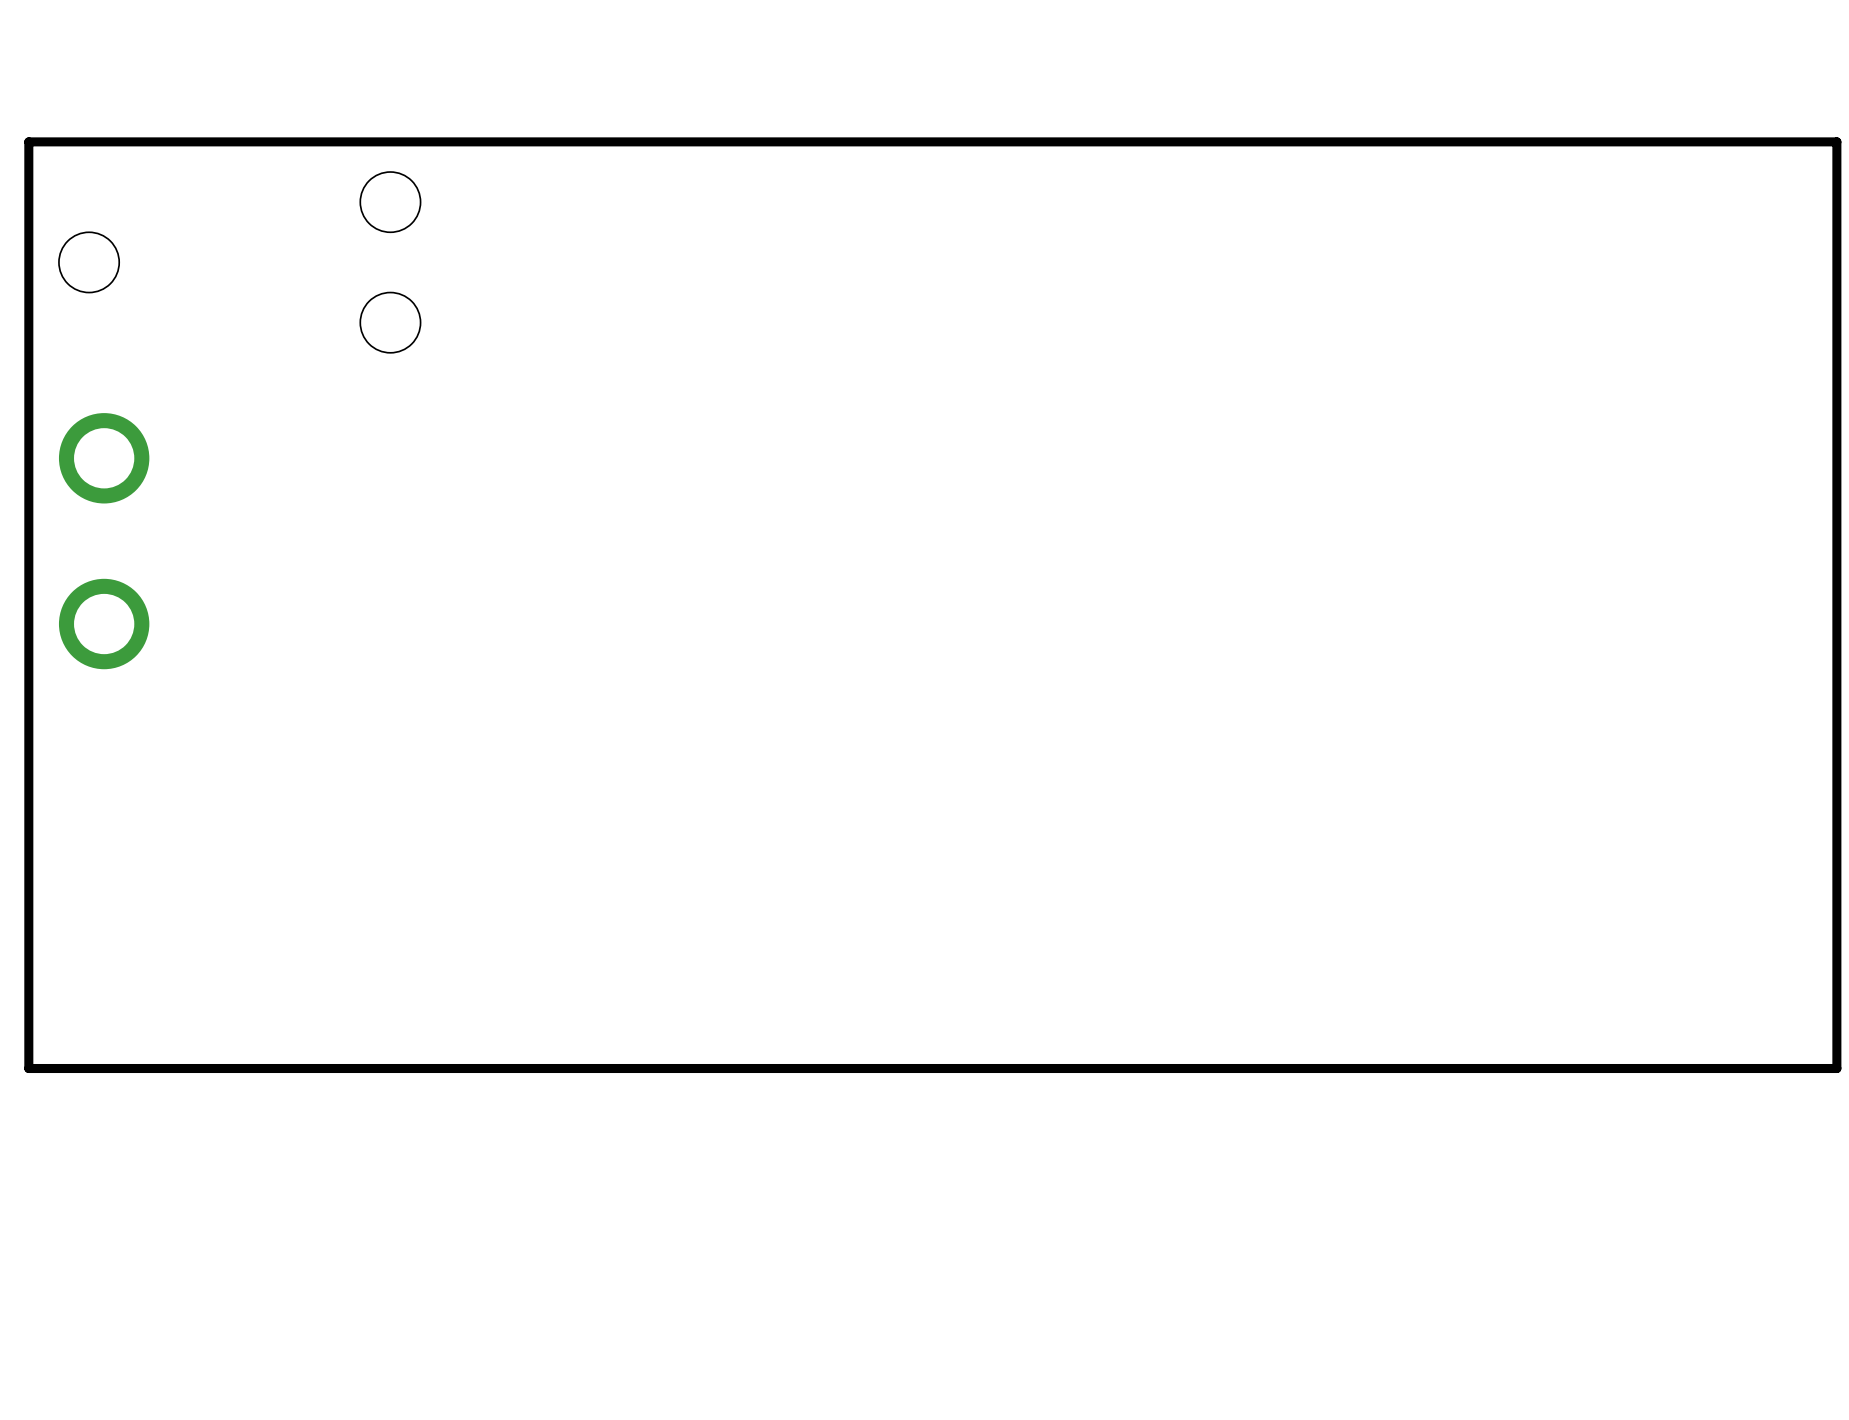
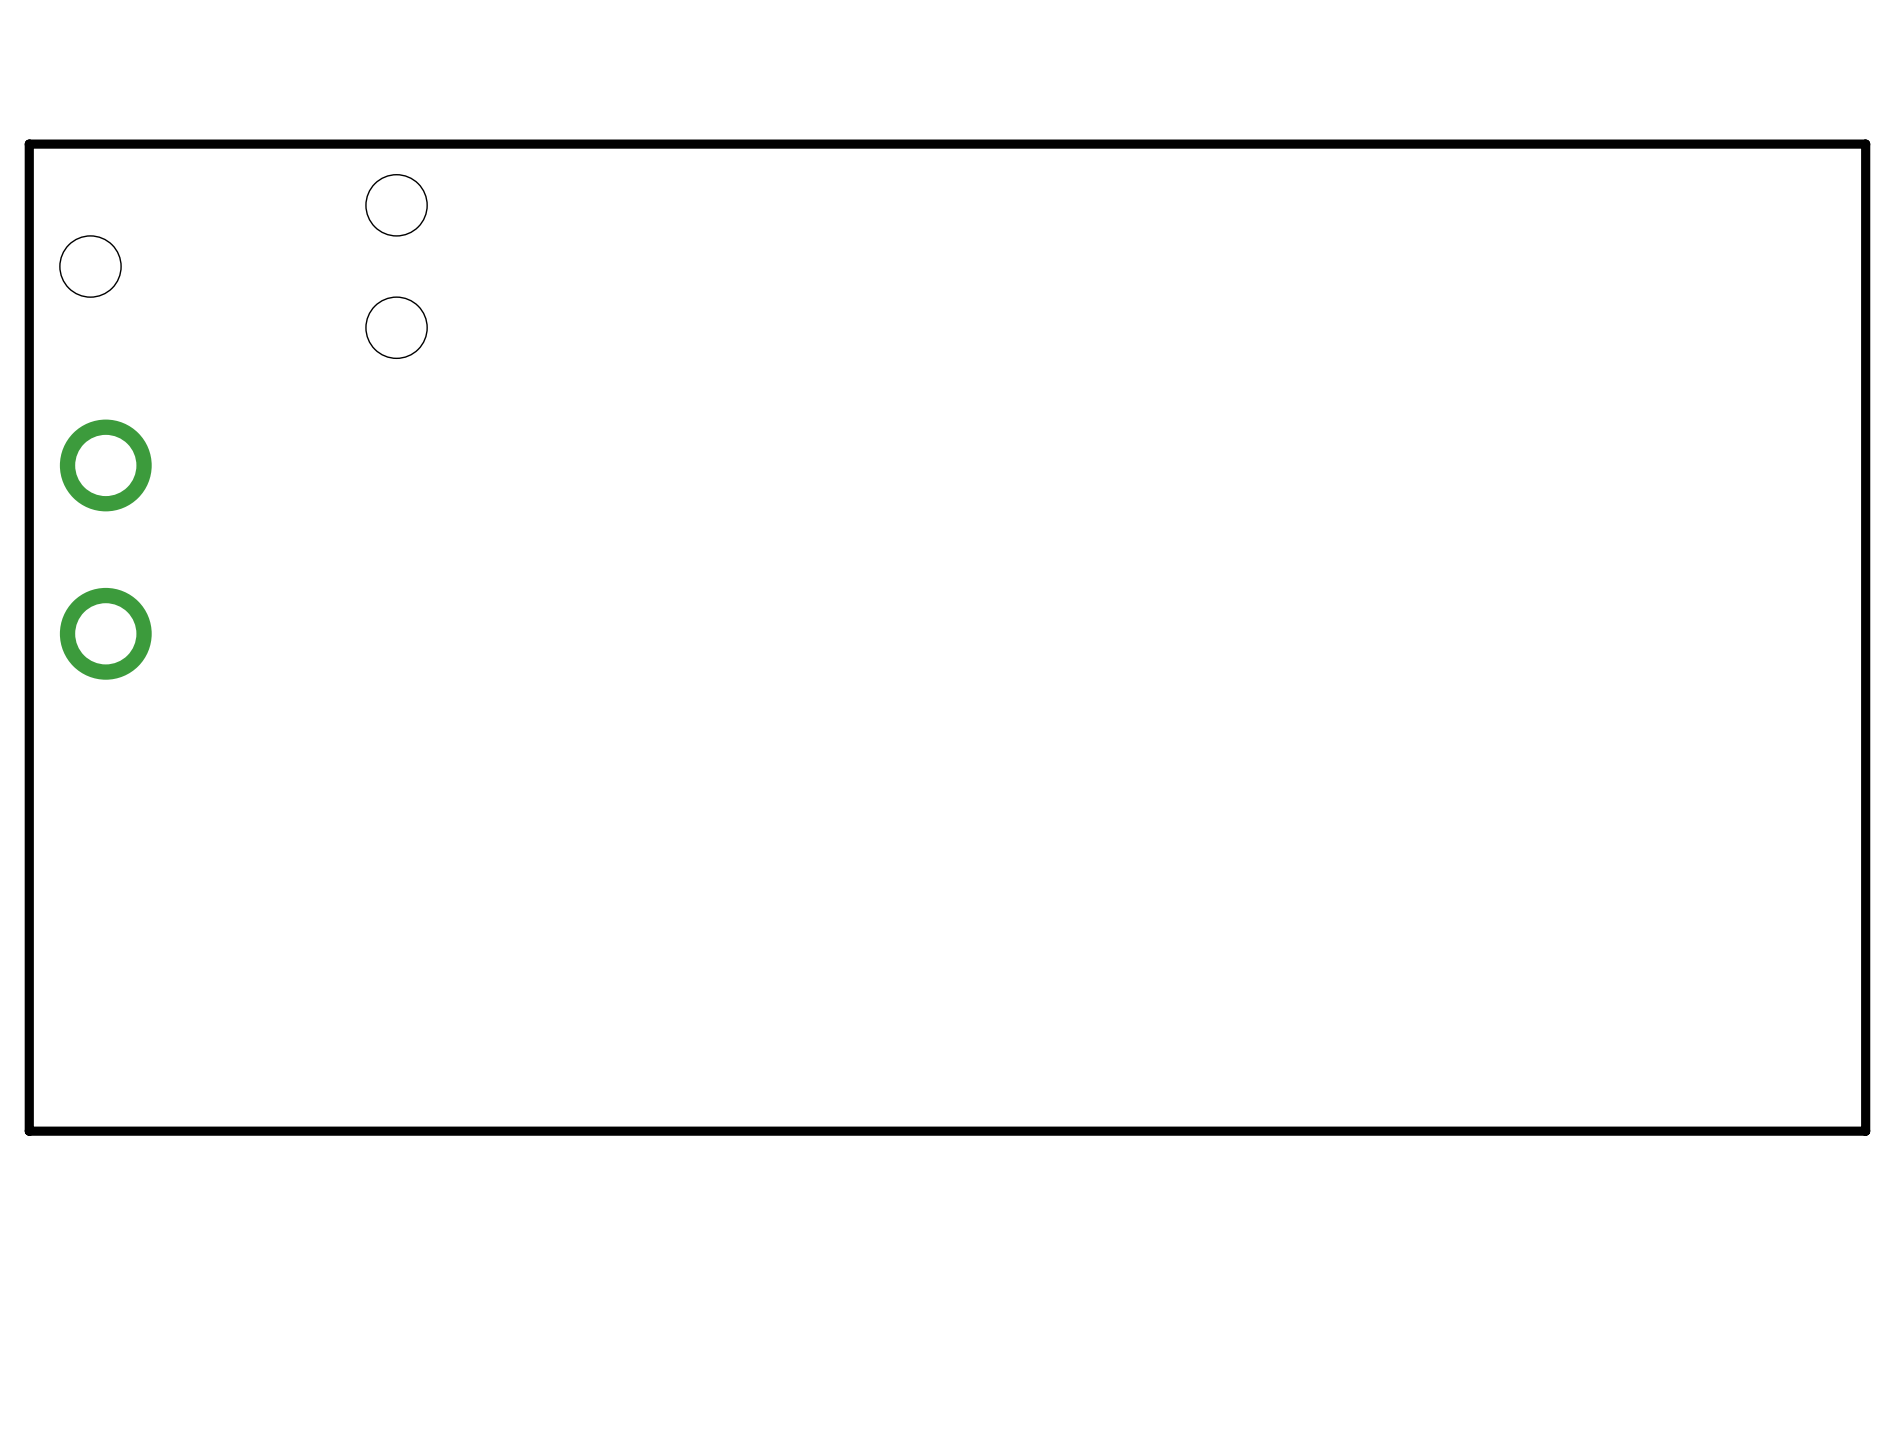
board edge: (1836, 1068) (28, 1068) -> (1865, 1085) (1865, 1131) (29, 1131) (29, 1085)

